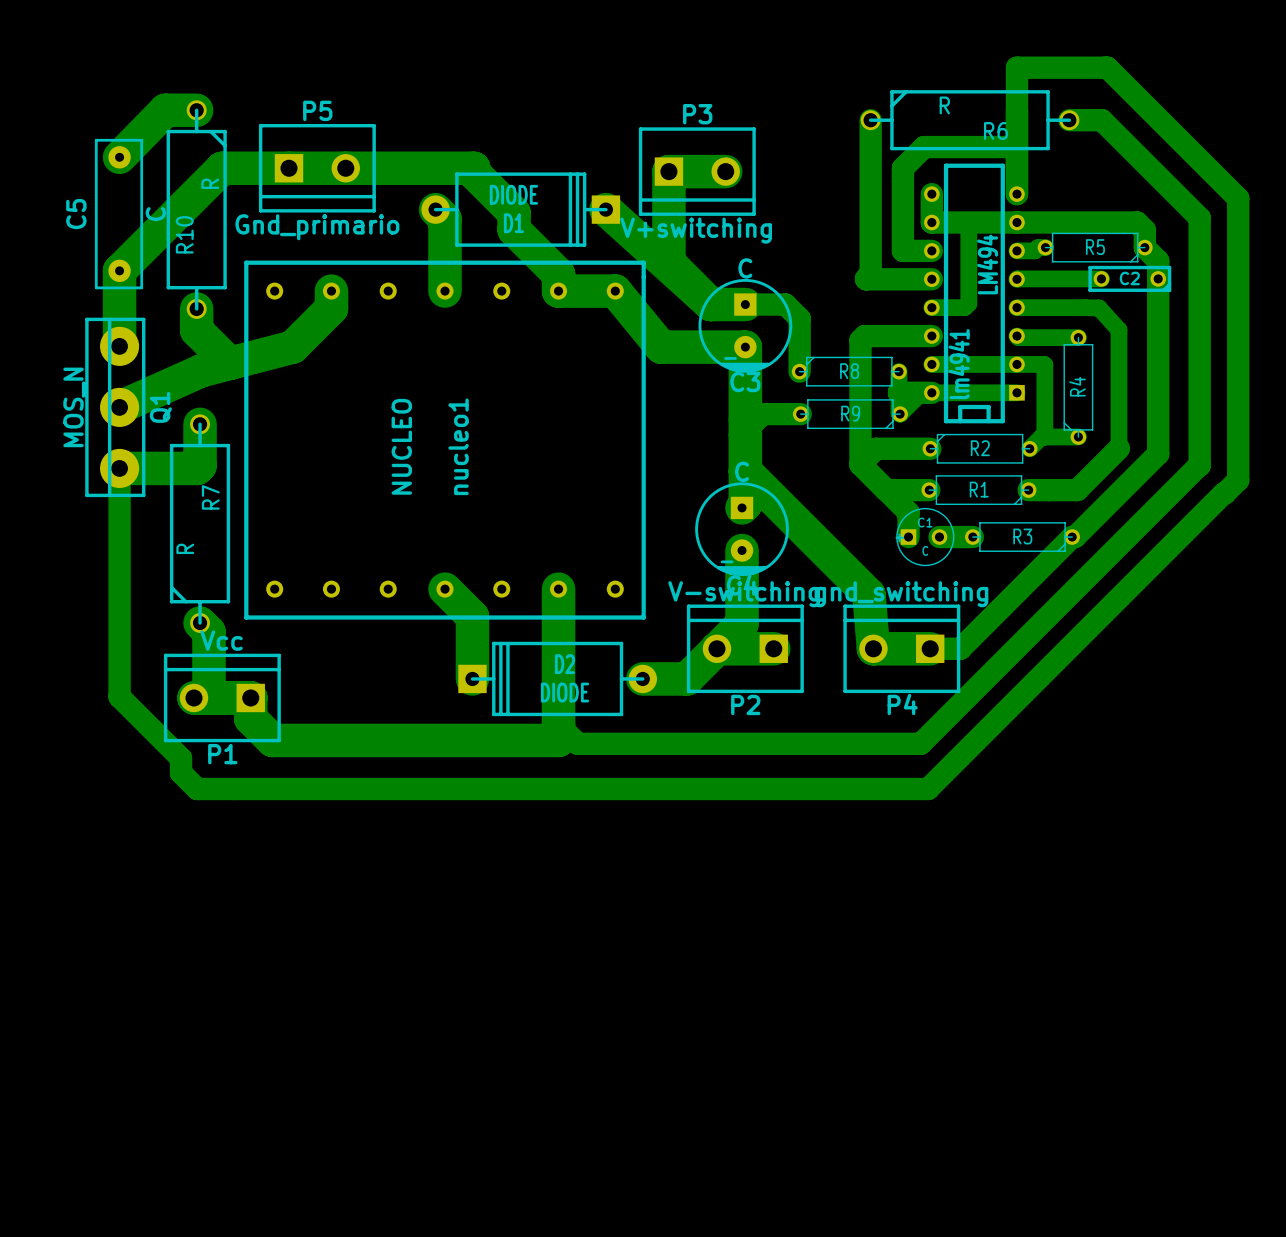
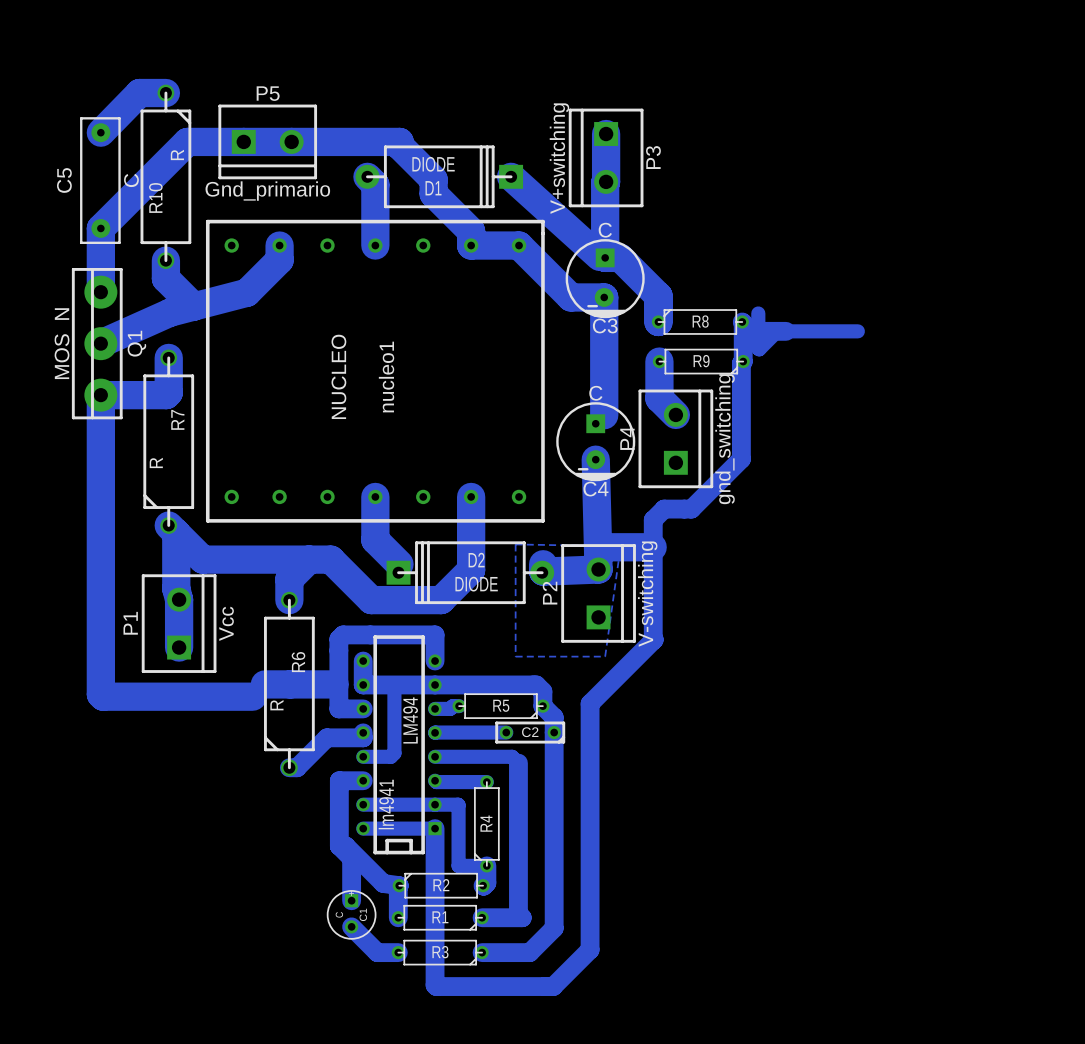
bottom track: (870, 120) (870, 274) (866, 278) (931, 279) -> none
R6 rotation: 0° (970, 120) -> 90° counterclockwise (289, 683)
R6 position: (970, 120) -> (289, 683)
bottom track: (1069, 120) (1101, 120) (1199, 218) (1199, 465) (920, 743) (577, 743) (558, 724) -> none
bottom track: (1016, 147) (924, 147) (902, 168) (902, 250) (931, 250) -> none
bottom track: none -> (606, 134) (605, 257) (620, 257) (658, 296) (658, 321)
P3 rotation: 0° (697, 171) -> 90° clockwise (606, 157)
bottom track: (725, 171) (668, 171) (668, 262) (710, 304) (785, 304) (799, 318) (799, 371) -> none
bottom track: (931, 194) (931, 222) -> none
bottom track: (1016, 194) (1016, 67) (1107, 67) (1238, 198) (1238, 480) (928, 789) (197, 789) (181, 772) (181, 758) (119, 696) -> (252, 696) (103, 696) (100, 694) (100, 587)
bottom track: (931, 222) (1137, 222) (1144, 230) (1144, 247) (1158, 260) (1158, 453) (960, 648) (873, 648) (868, 594) (745, 471) -> none
bottom track: (968, 222) (968, 303) (964, 307) (931, 307) -> none
bottom track: (1045, 247) (1038, 247) (1034, 250) (1016, 250) -> none
R5 position: (1095, 247) -> (501, 706)
C3 footprint: [698, 278, 793, 373] -> [565, 239, 645, 319]
bottom track: (1101, 278) (1016, 279) -> none
C2 position: (1129, 278) -> (530, 732)
bottom track: (615, 291) (661, 347) (745, 347) (745, 504) (742, 507) -> (519, 245) (570, 297) (604, 297) (604, 415)
lm4941 position: (974, 293) -> (399, 744)
bottom track: (1016, 307) (1099, 307) (1118, 329) (1118, 448) (1077, 490) (1028, 490) -> none
bottom track: (931, 336) (864, 336) (860, 340) (860, 464) -> none
bottom track: (1016, 336) (1018, 337) (1078, 337) -> none
bottom track: (931, 364) (1044, 364) (1044, 436) -> none
R8 position: (849, 371) -> (700, 321)
bottom track: none -> (742, 321) (741, 459) (691, 509) (664, 509) (653, 519) (653, 640)
R4 position: (1078, 387) -> (486, 823)
R9 position: (850, 414) -> (701, 361)
bottom track: (745, 419) (743, 419) (745, 414) (800, 414) (766, 414) (745, 435) -> none
bottom track: none -> (659, 361) (659, 398) (675, 414)
bottom track: (1078, 436) (1041, 436) (1029, 448) -> none
bottom track: (930, 448) (876, 448) (860, 464) -> none
R2 position: (980, 448) -> (441, 885)
bottom track: (860, 464) (908, 512) (908, 537) -> none
bottom track width: thin (119, 468) (119, 696) -> thick (100, 395) (100, 587)
bottom track: (886, 490) (929, 490) -> none
R1 position: (978, 490) -> (440, 917)
C4 position: (742, 529) -> (595, 441)
C1 rotation: 0° (925, 537) -> 90° clockwise (351, 914)
C1 position: (925, 537) -> (351, 914)
bottom track: (939, 537) (972, 537) -> none
R3 position: (1022, 537) -> (440, 952)
bottom track: none -> (595, 459) (598, 569) (543, 571) (543, 564)
bottom track: (742, 550) (742, 623) (686, 678) (642, 678) -> none
bottom track: (445, 589) (472, 616) (472, 678) -> (375, 496) (375, 540) (399, 564)
bottom zone outline: none -> (515, 544) (623, 546) (620, 549) (605, 656) (515, 656) (515, 544)
P2 rotation: 0° (745, 648) -> 90° clockwise (598, 593)
P4 rotation: 0° (901, 648) -> 90° clockwise (675, 438)
P4 position: (901, 648) -> (675, 438)
bottom track: none -> (309, 559) (289, 579) (289, 600)
bottom track: (558, 675) (558, 740) (272, 740) (250, 718) (250, 697) (193, 697) -> (471, 570) (441, 600) (371, 600) (330, 559) (202, 559) (176, 533)
bottom track: none -> (176, 588) (179, 599) (179, 647)
P1 rotation: 0° (222, 697) -> 90° clockwise (179, 623)
bottom track: none -> (653, 639) (590, 703) (590, 949) (553, 986) (436, 986) (435, 828) (363, 828)
bottom track: none -> (363, 661) (363, 684)
bottom track: none -> (435, 661) (435, 634) (343, 634) (338, 639) (338, 708) (363, 708)
bottom track: none -> (264, 684) (338, 684)
bottom track: none -> (363, 684) (536, 684) (542, 691) (542, 706) (554, 717) (554, 928) (529, 952) (482, 952)
bottom track: none -> (394, 684) (394, 753) (390, 756) (363, 756)
bottom track: none -> (459, 706) (452, 706) (450, 708) (435, 708)
bottom track: none -> (363, 732) (363, 737) (326, 737) (297, 767) (289, 767)
bottom track: none -> (506, 732) (435, 732)
bottom track: none -> (435, 756) (512, 756) (518, 763)
bottom track: none -> (518, 763) (518, 913) (522, 917) (482, 917) (518, 917) (518, 763)
bottom track: none -> (363, 780) (339, 780) (339, 846)
bottom track: none -> (435, 780) (486, 782)
bottom track: none -> (363, 804) (458, 804) (458, 865) (486, 865) (486, 882) (483, 885)
bottom track: none -> (339, 846) (345, 846) (383, 883) (399, 885) (398, 917)
bottom track: none -> (339, 846) (351, 858) (351, 900)
bottom track: none -> (351, 926) (377, 952) (398, 952)

